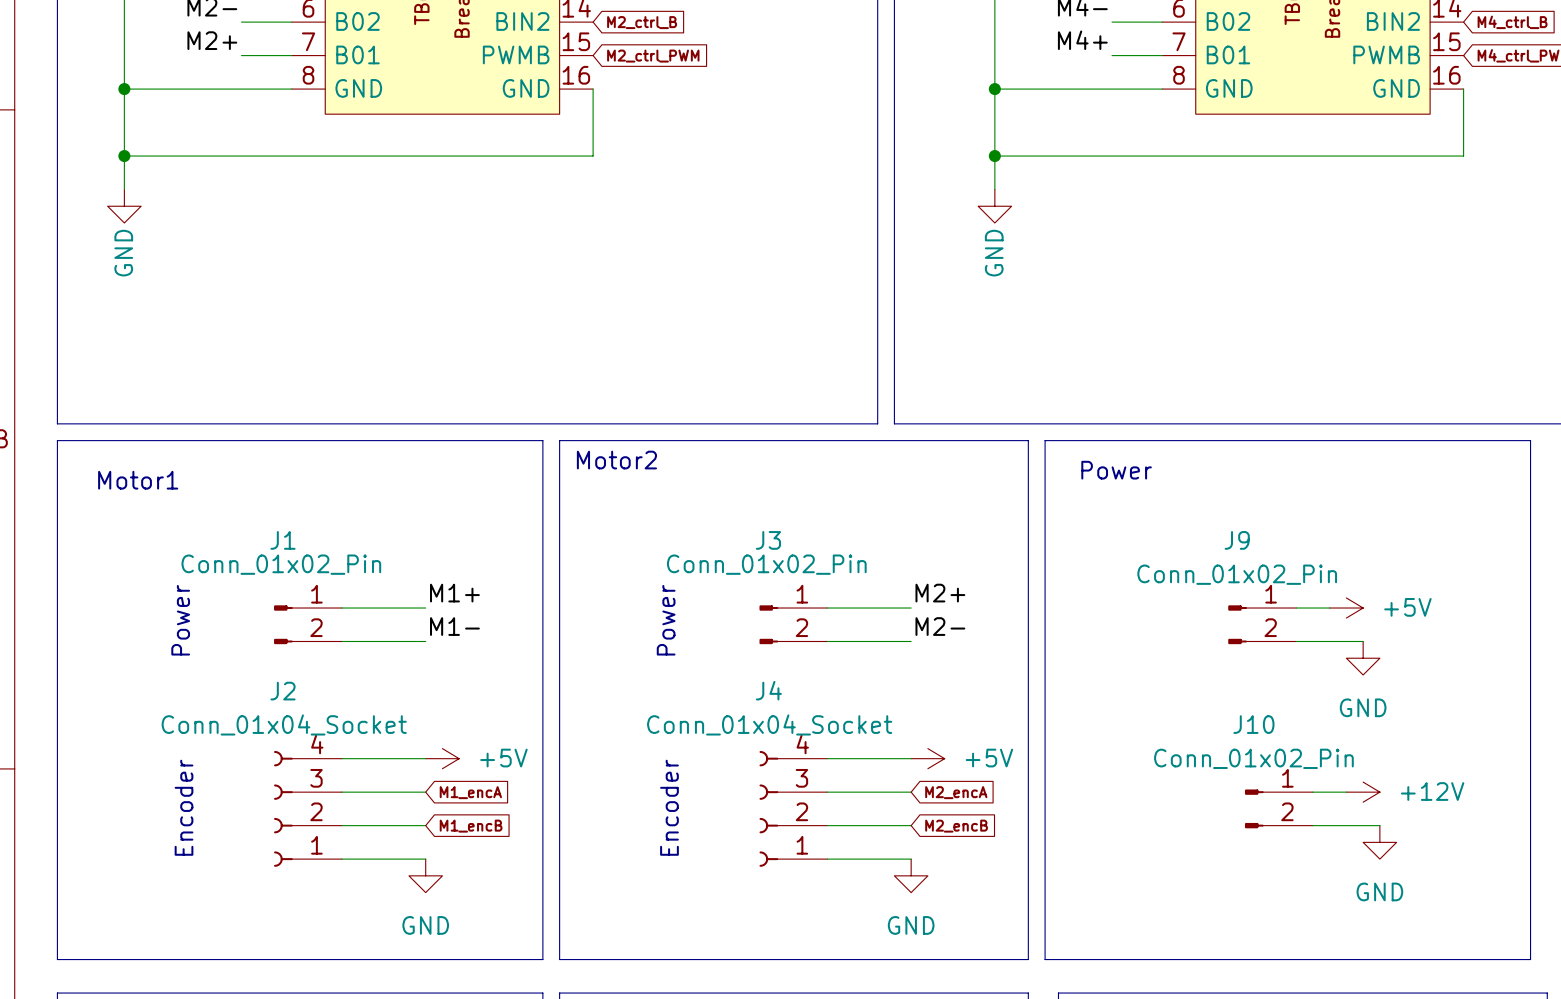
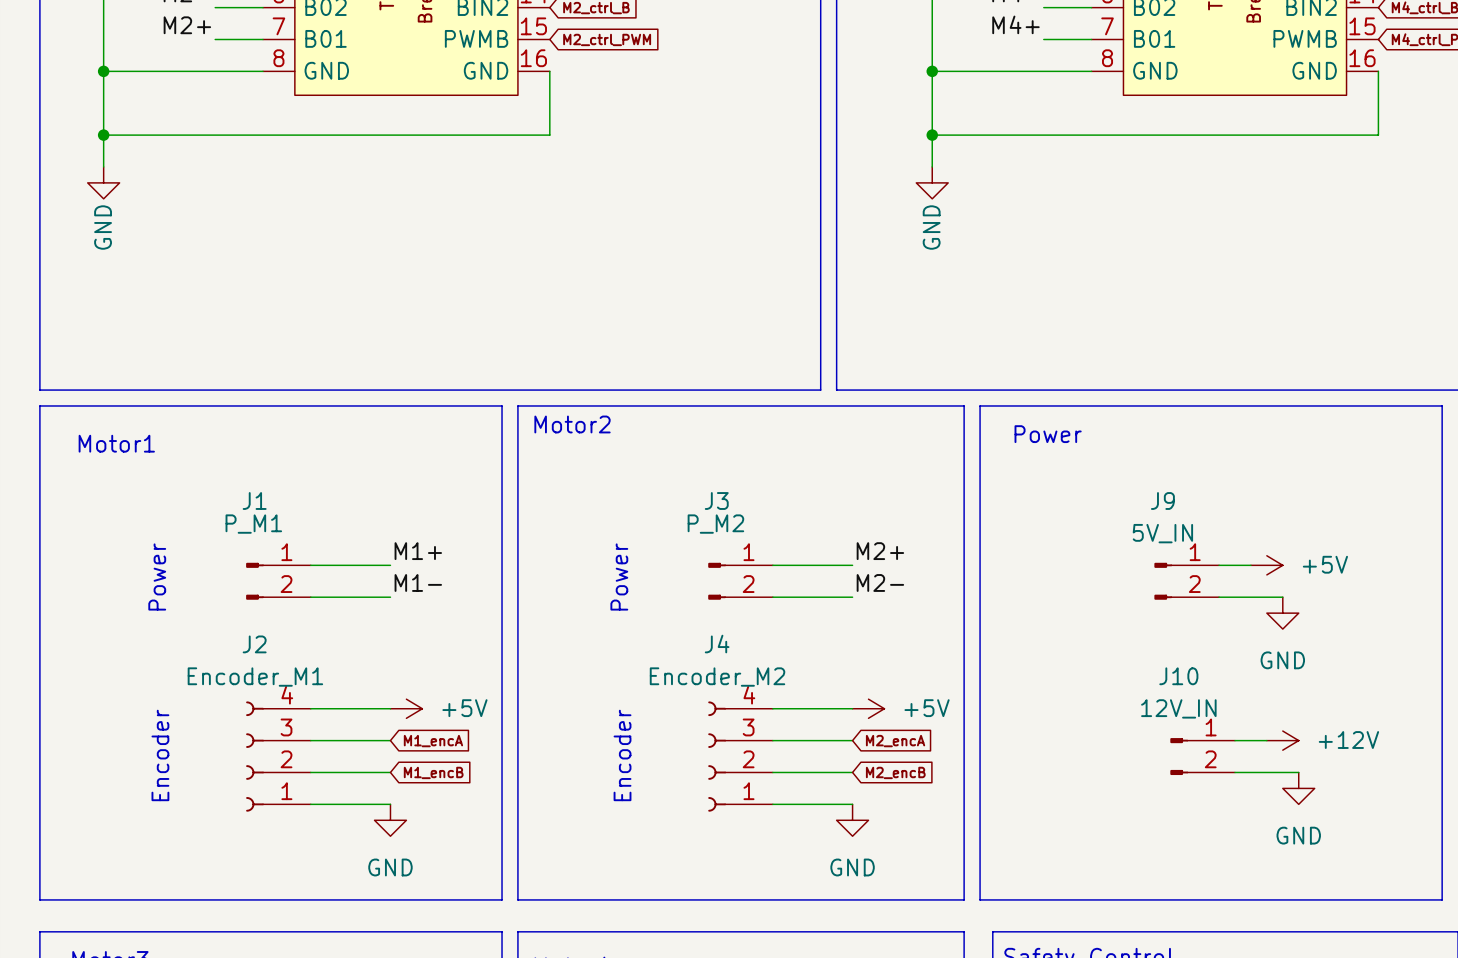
J1 value: Conn_01x02_Pin (281, 564) -> P_M1 (253, 524)
J3 value: Conn_01x02_Pin (766, 564) -> P_M2 (715, 524)
J9 value: Conn_01x02_Pin (1237, 574) -> 5V_IN (1162, 533)
J2 value: Conn_01x04_Socket (284, 724) -> Encoder_M1 (255, 677)
J4 value: Conn_01x04_Socket (769, 724) -> Encoder_M2 (717, 677)
J10 value: Conn_01x02_Pin (1253, 758) -> 12V_IN (1178, 708)

